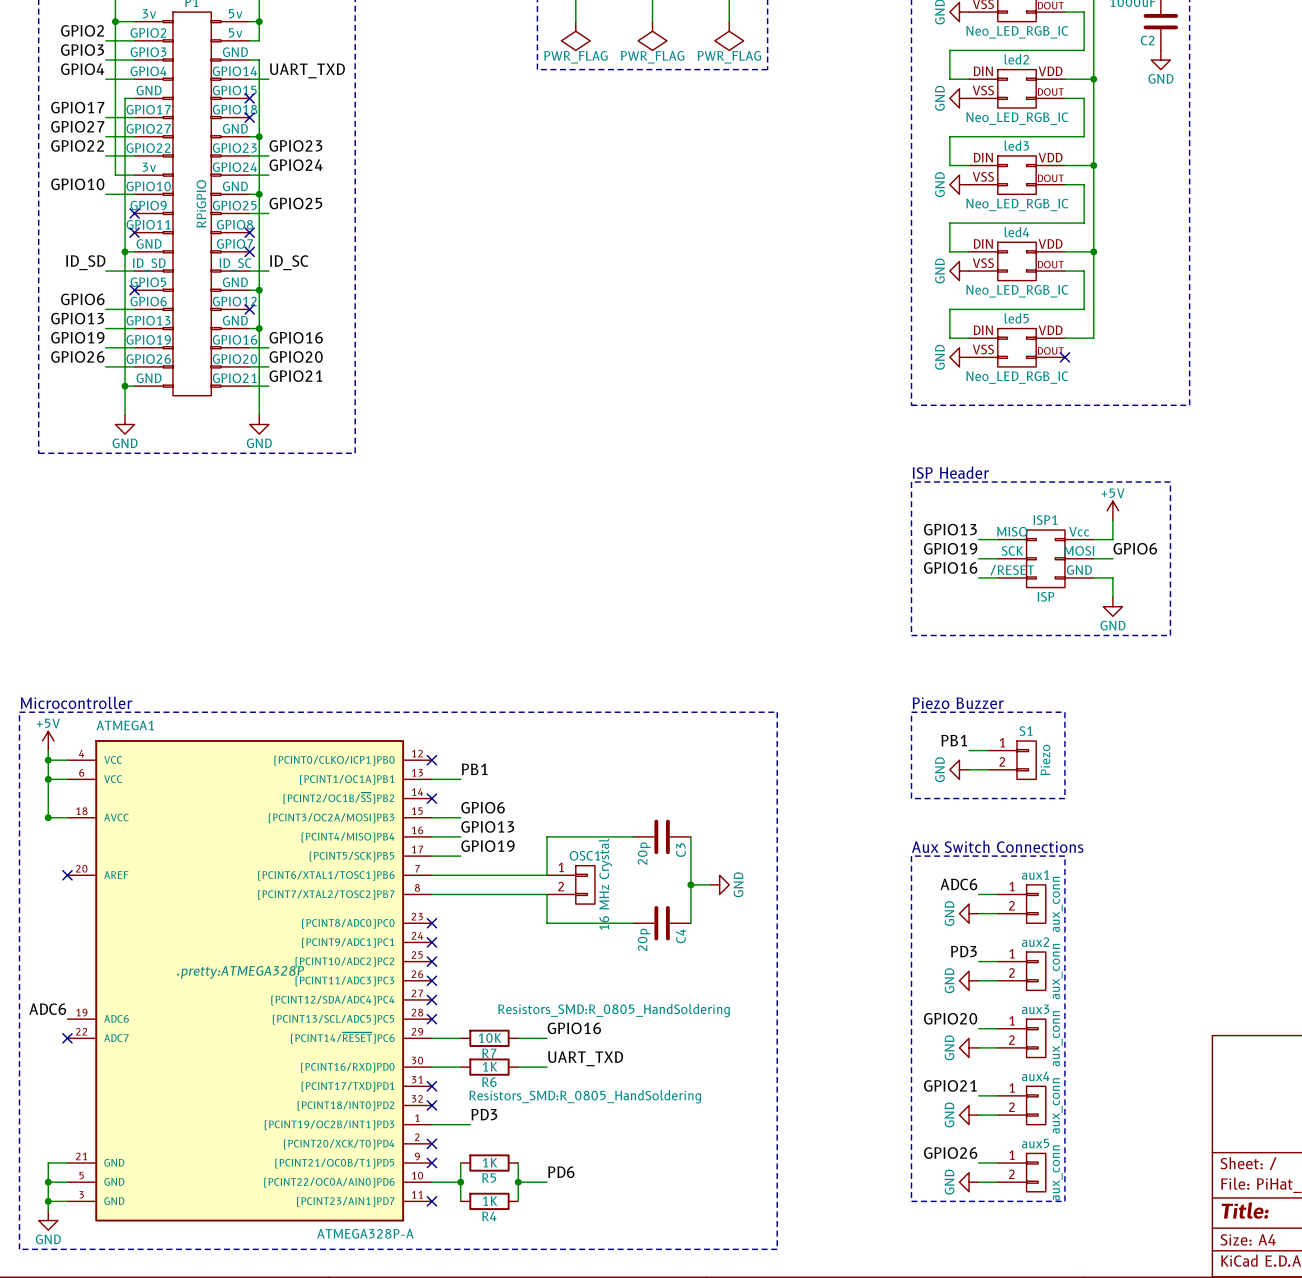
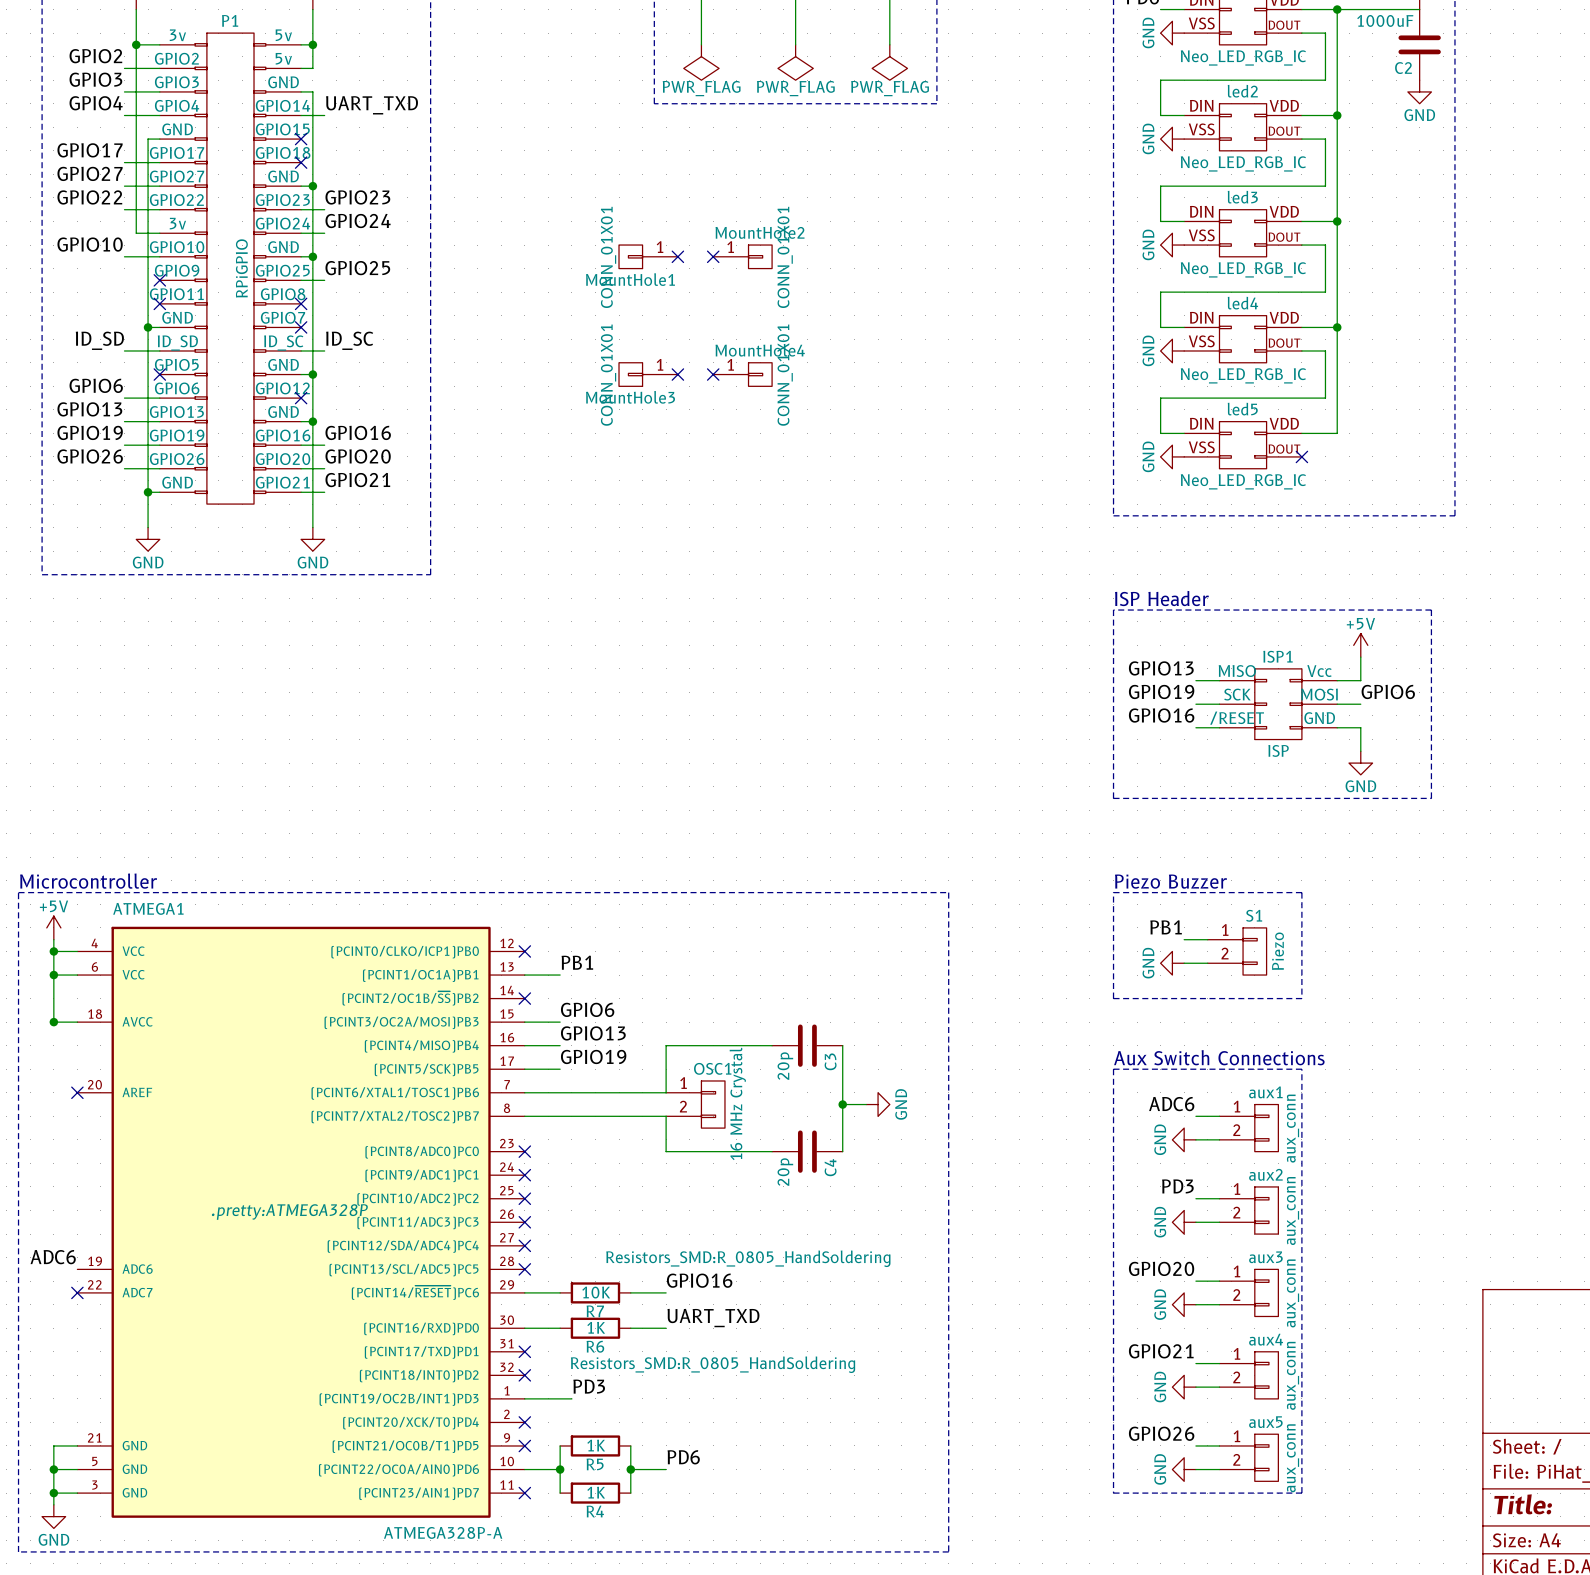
MountHole1: none -> CONN_01X01 (648, 256)
no-connect mark: none -> (677, 256)
no-connect mark: none -> (713, 256)
MountHole2: none -> CONN_01X01 (742, 256)
MountHole3: none -> CONN_01X01 (648, 374)
no-connect mark: none -> (677, 374)
no-connect mark: none -> (713, 374)
MountHole4: none -> CONN_01X01 (742, 374)

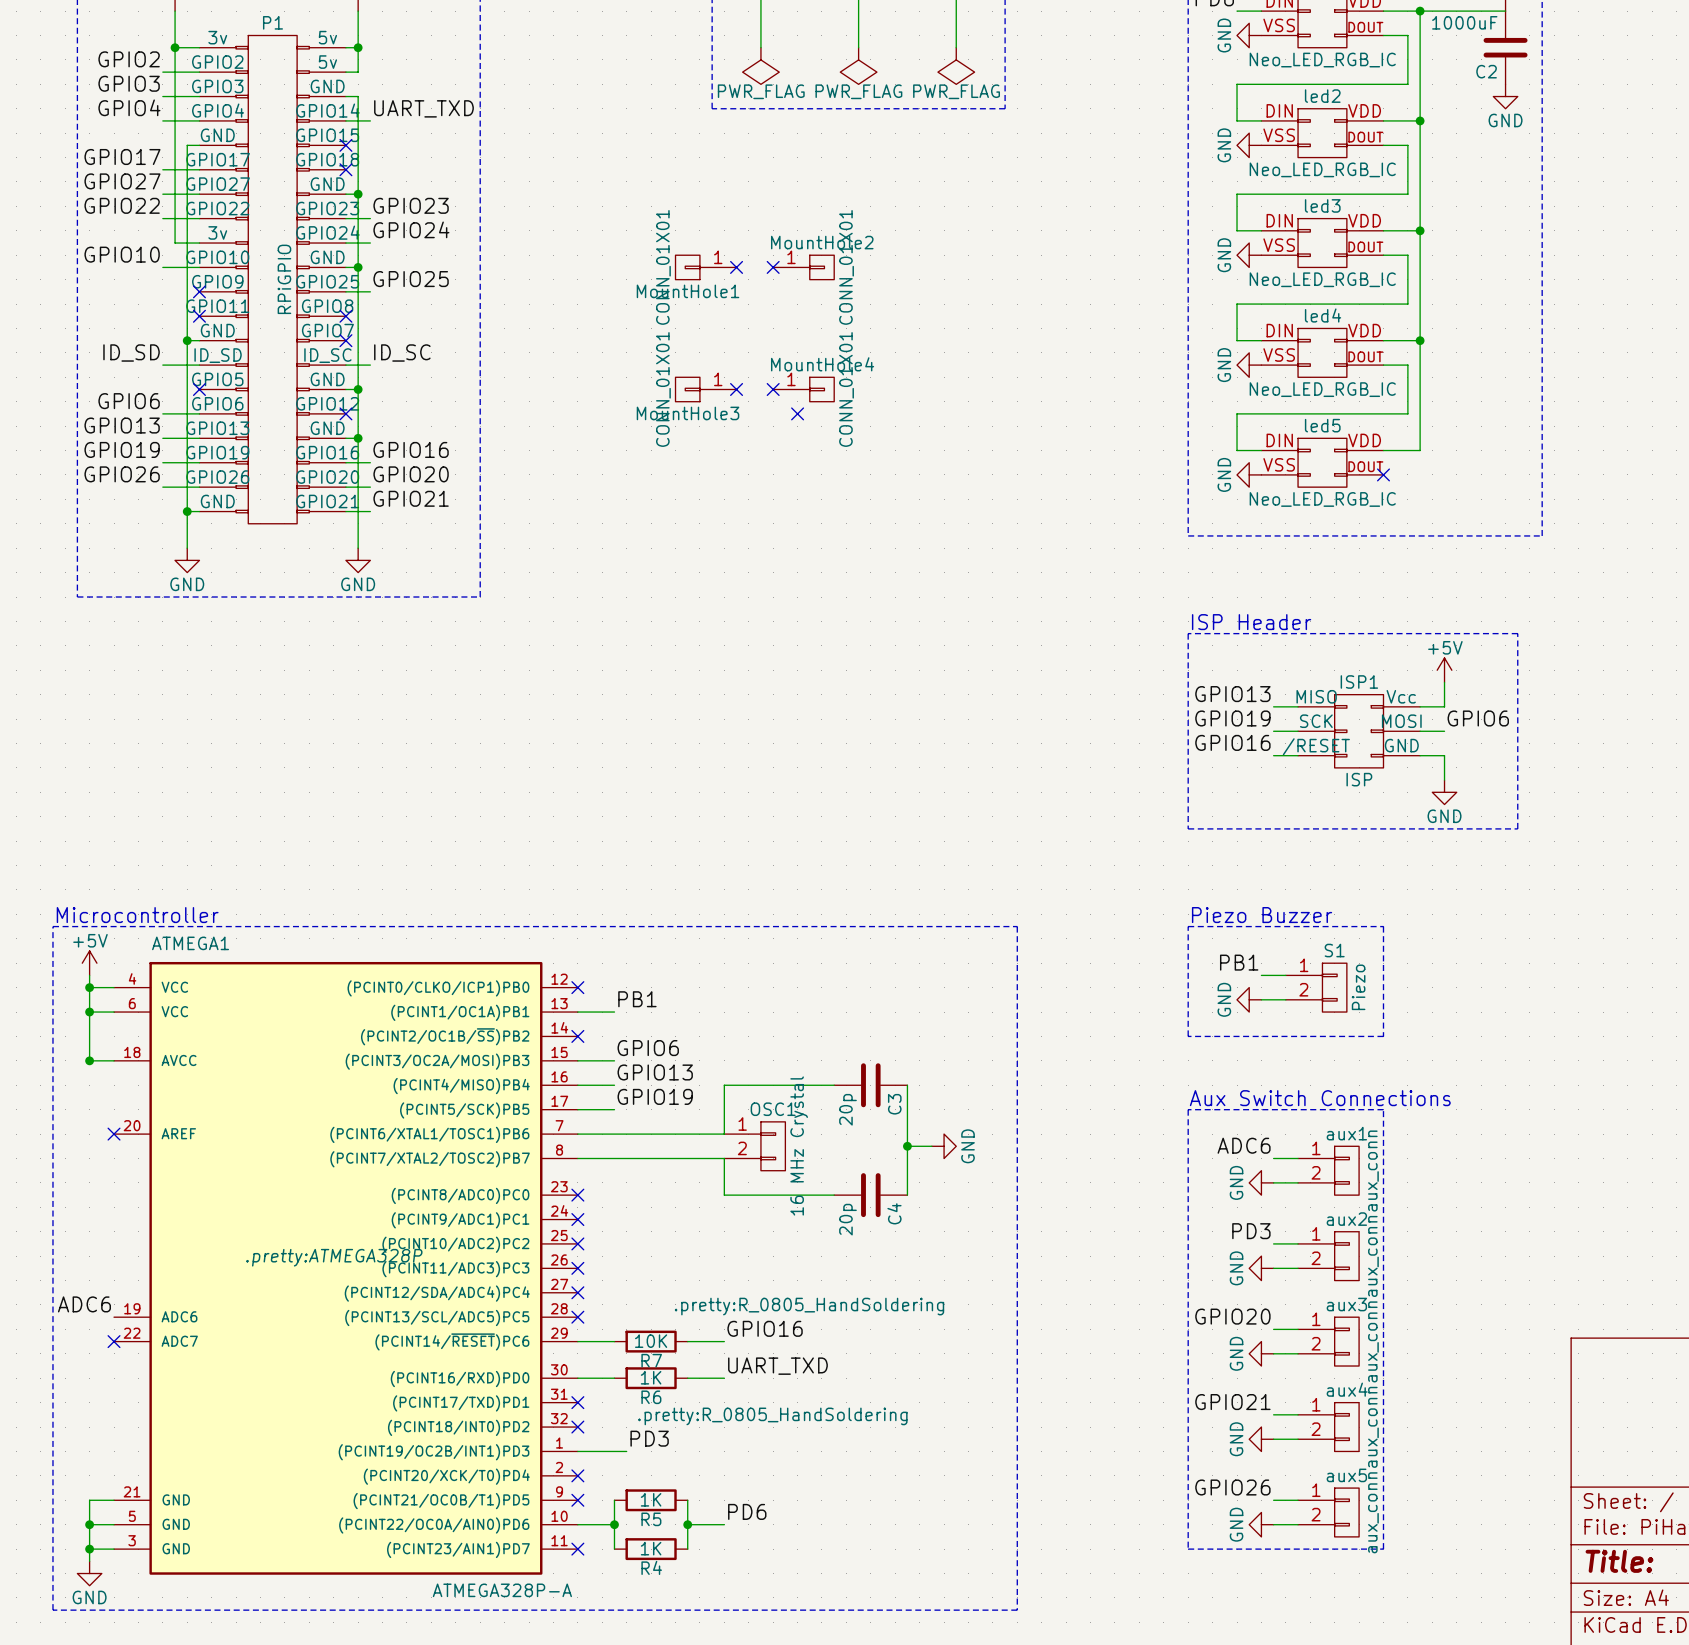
no-connect mark: none -> (797, 413)
R7 text: Resistors_SMD:R_0805_HandSoldering (748, 1258) -> .pretty:R_0805_HandSoldering (809, 1306)
R6 text: Resistors_SMD:R_0805_HandSoldering (713, 1364) -> .pretty:R_0805_HandSoldering (772, 1416)

